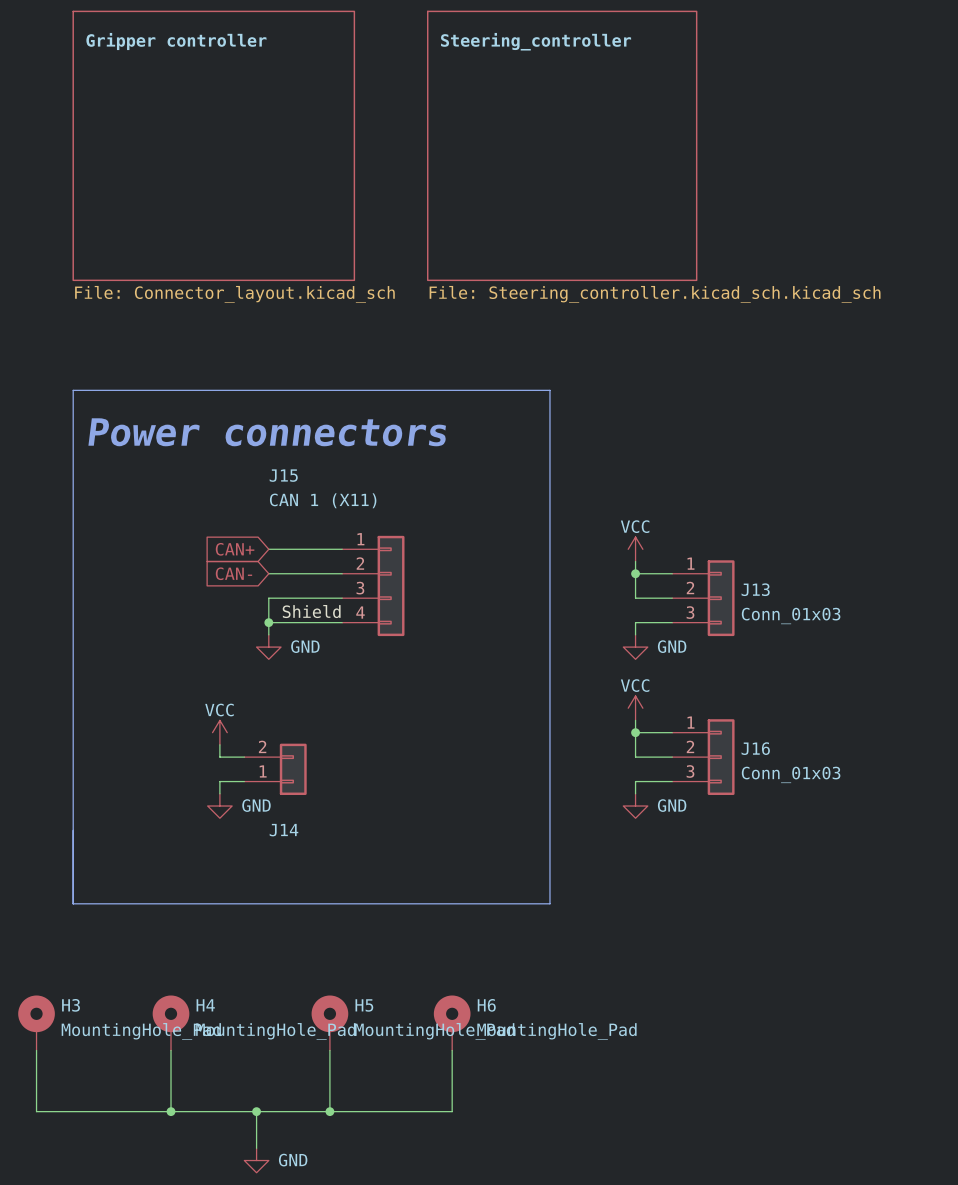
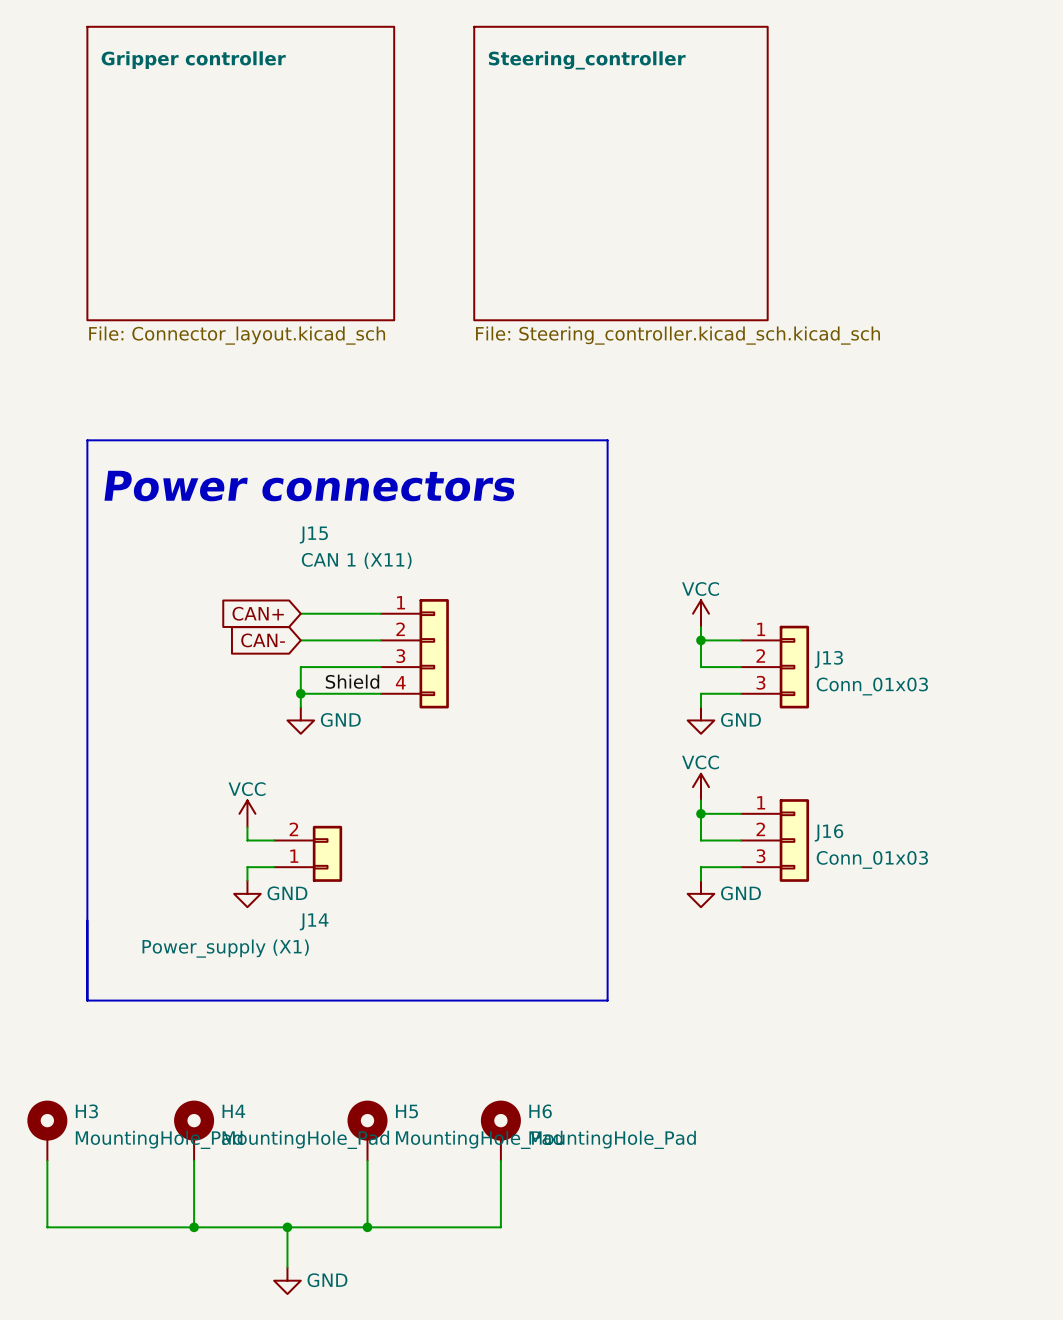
J14 value: none -> Power_supply (X1) (225, 948)

